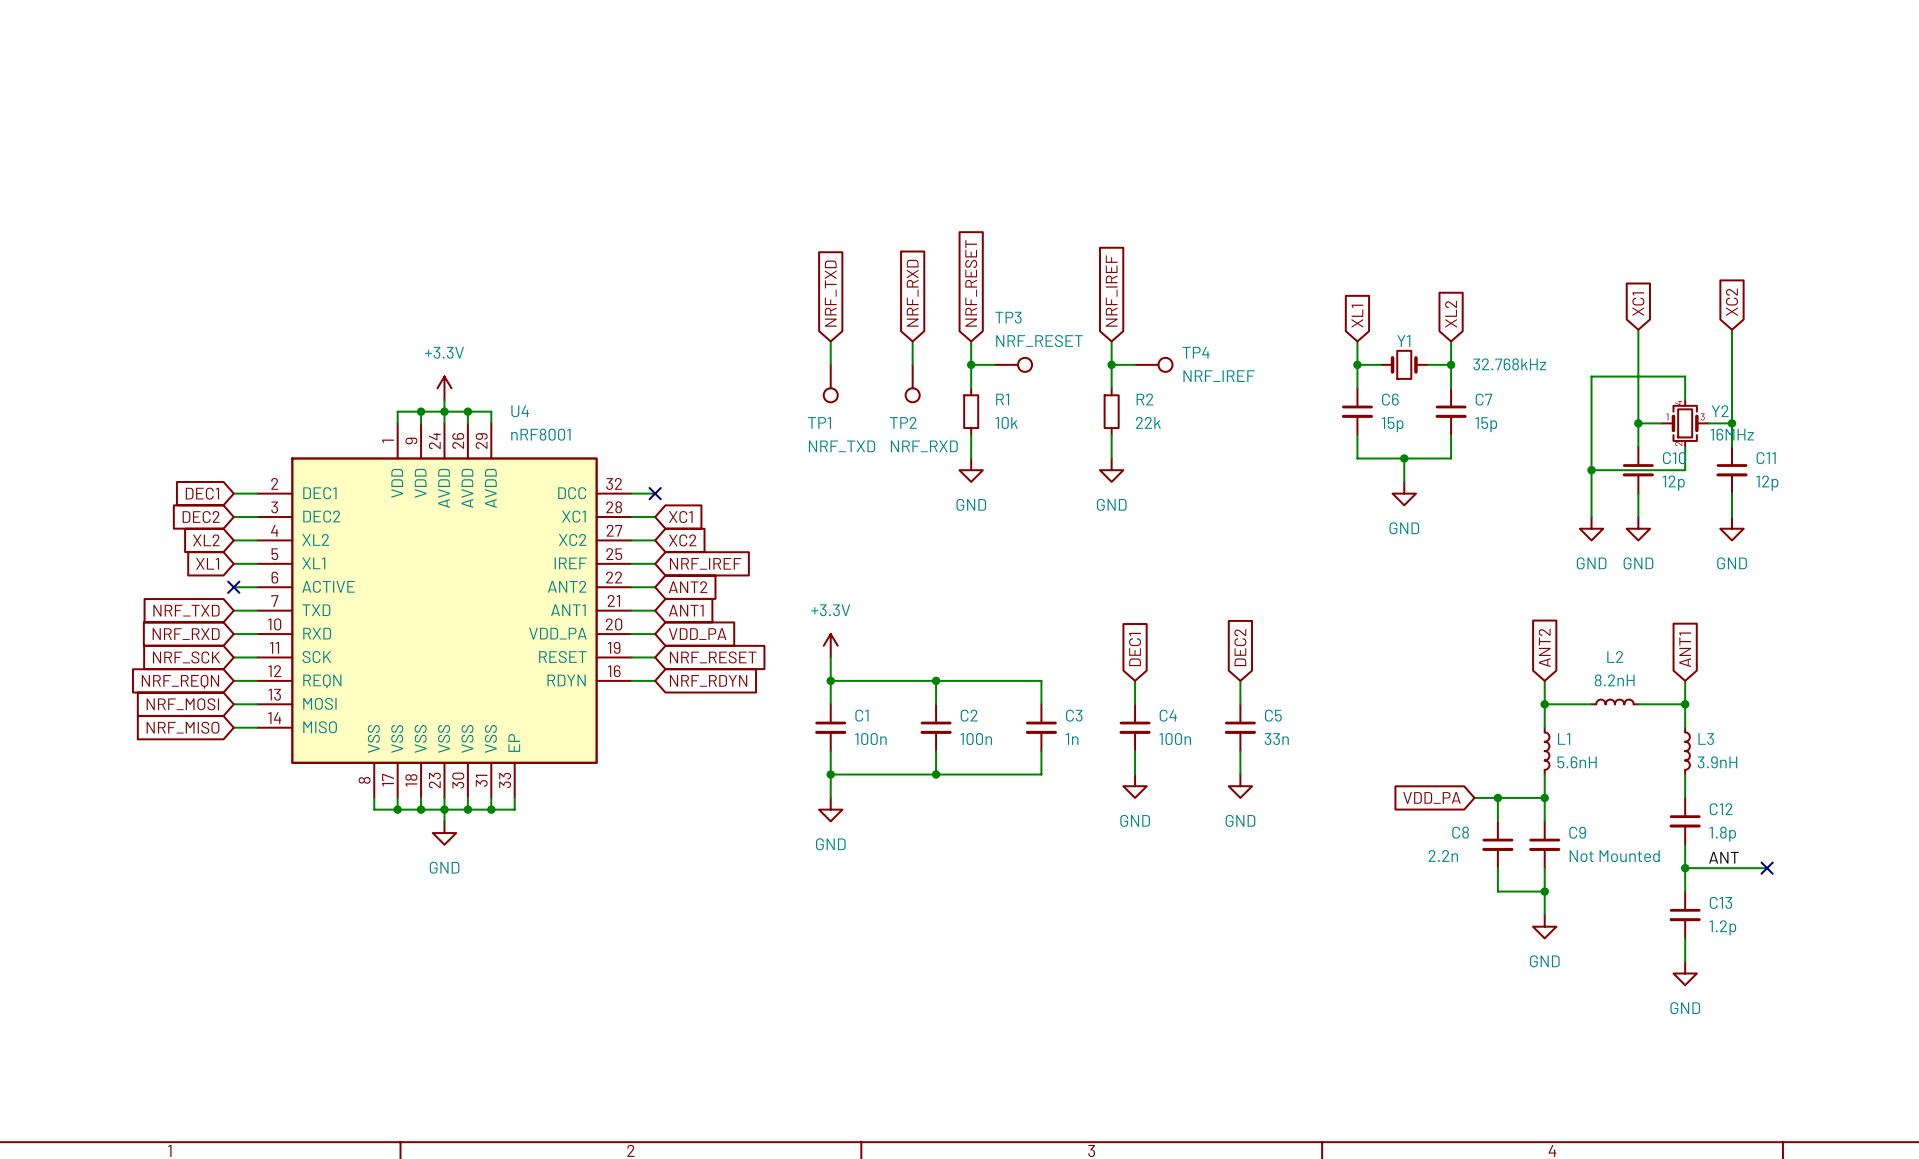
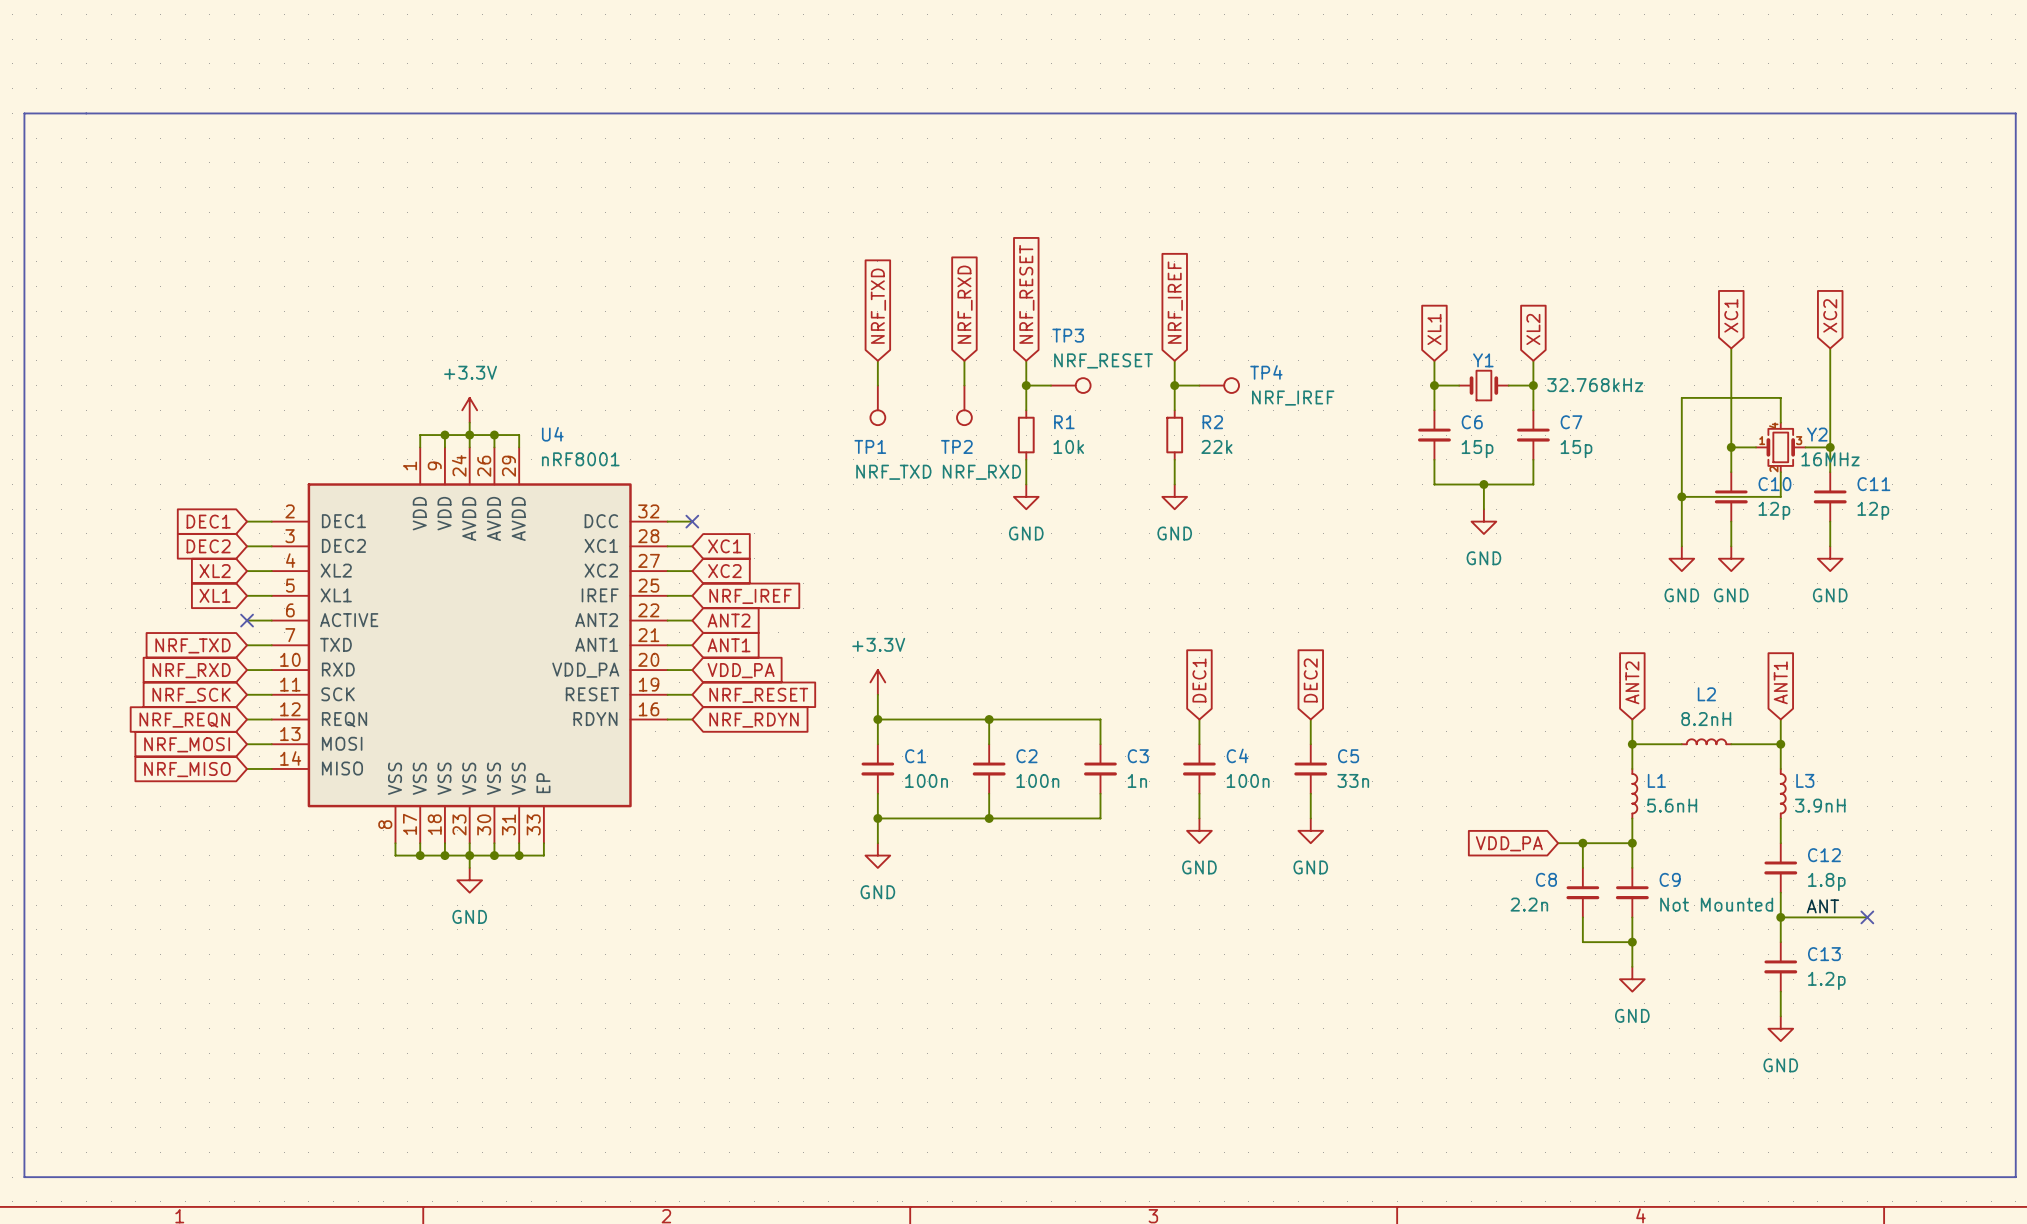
line: none -> (24, 113) (2015, 113) (2015, 1177) (24, 1177) (24, 113)

